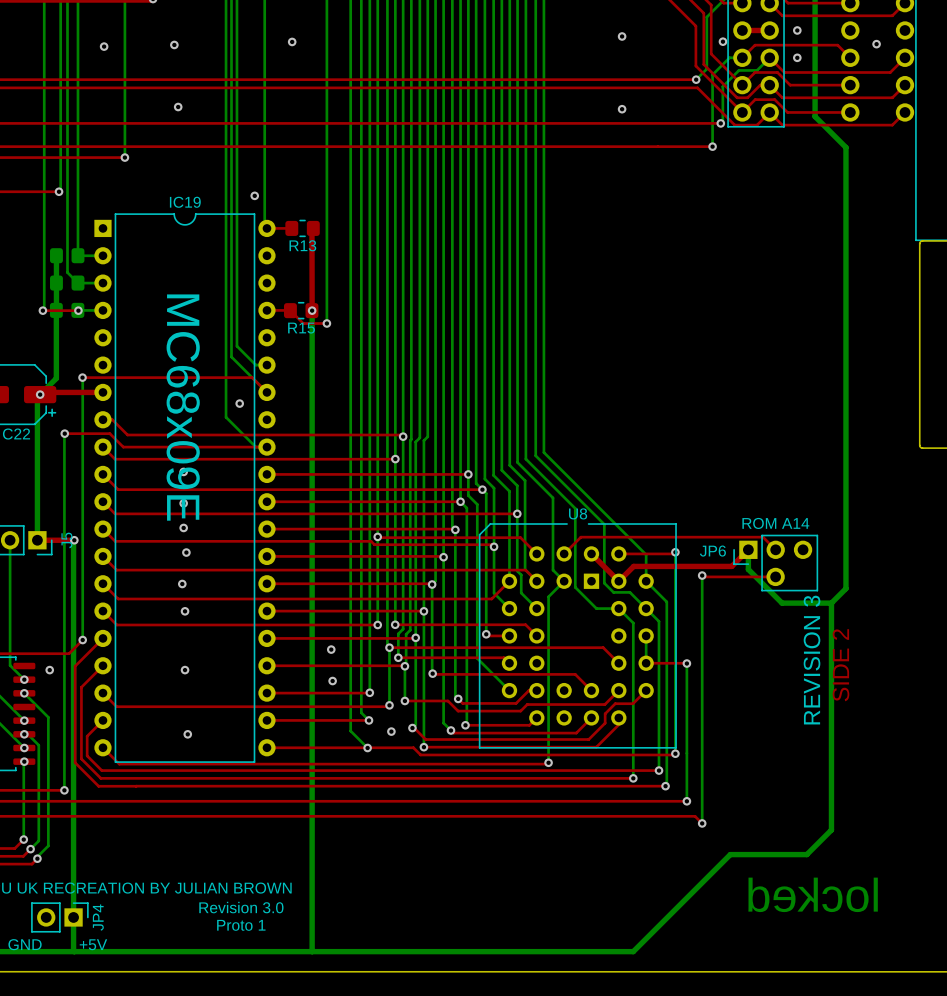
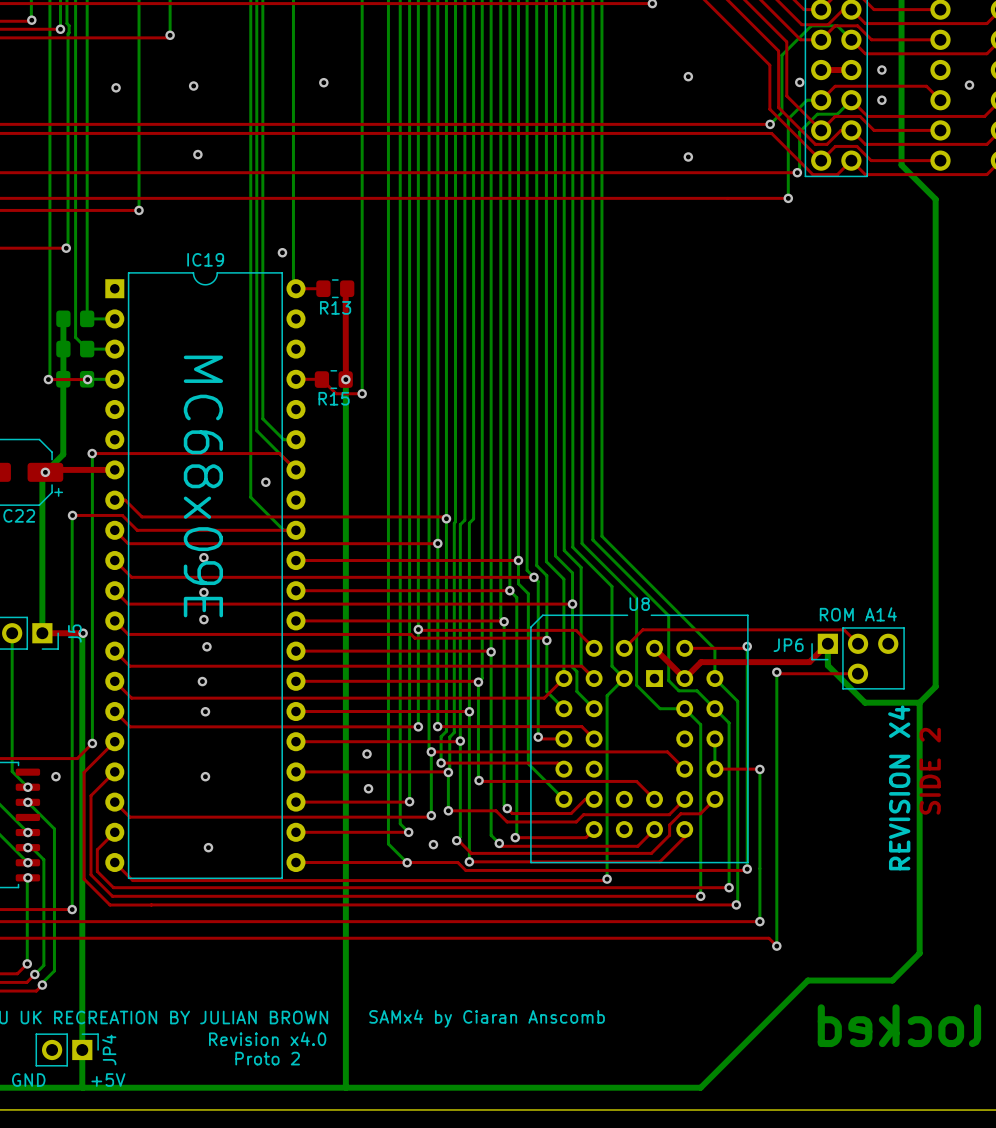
text: REVISION 3 (812, 660) -> REVISION X4 (899, 787)
text: none -> SAMx4 by Ciaran Anscomb (487, 1018)
text: Revision 3.0 (241, 907) -> Revision x4.0 (267, 1038)
text: Proto 1 (241, 925) -> Proto 2 (267, 1058)

